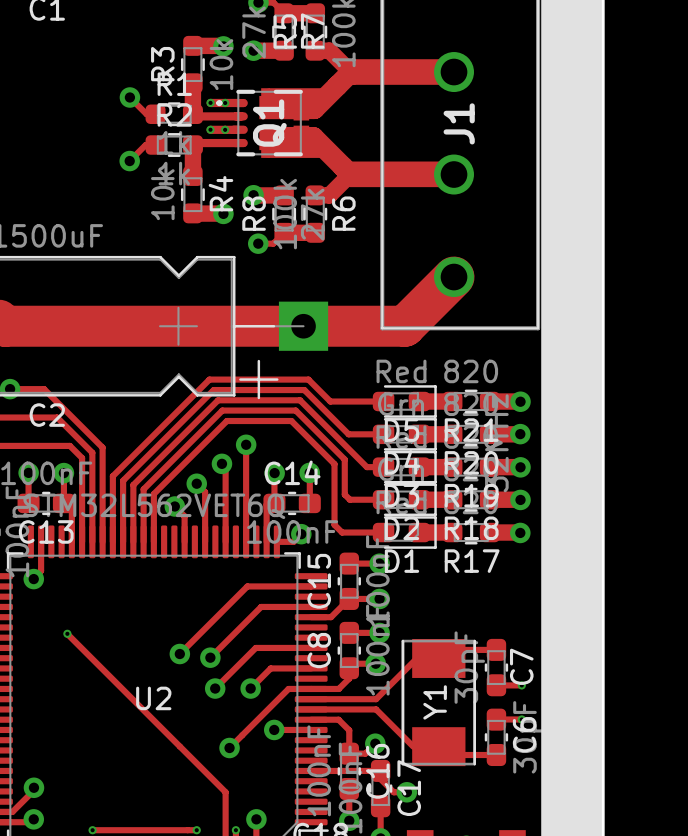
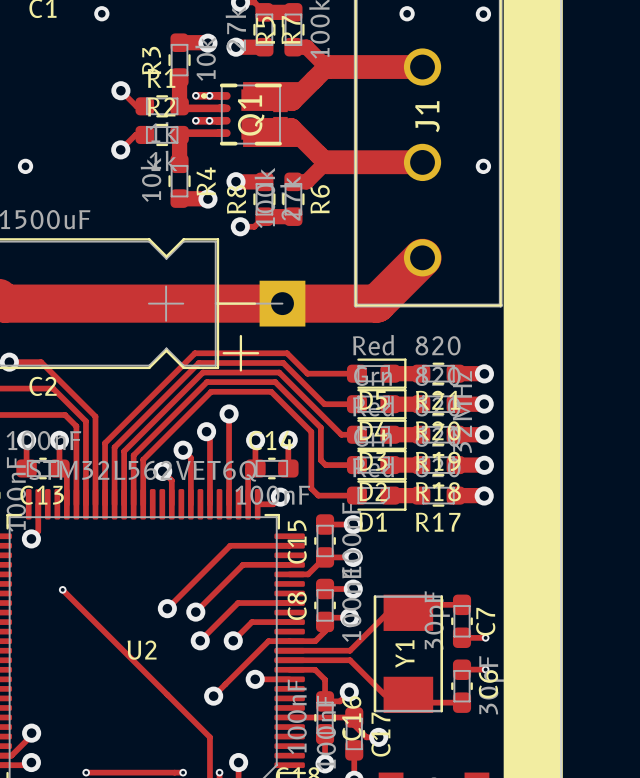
via: none -> (101, 13)
via: none -> (407, 13)
via: none -> (483, 14)
via: none -> (25, 166)
via: none -> (483, 166)

